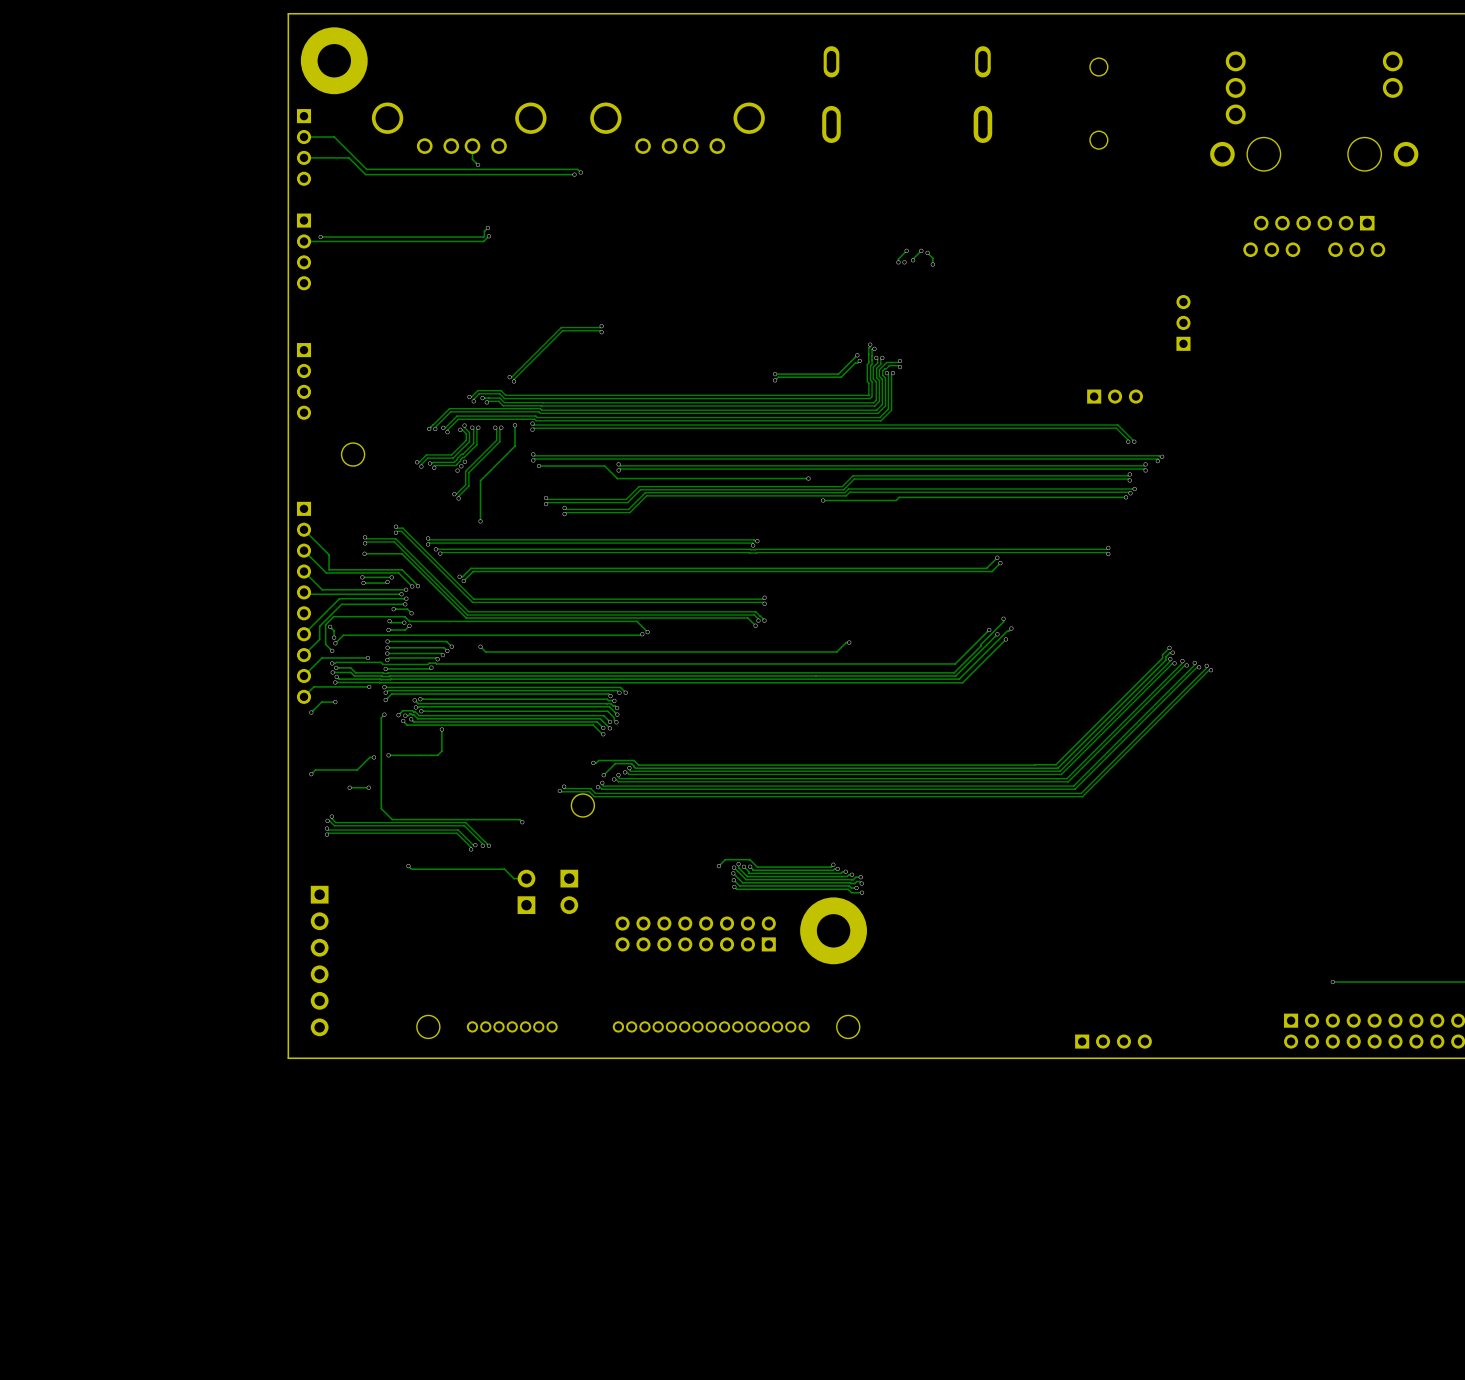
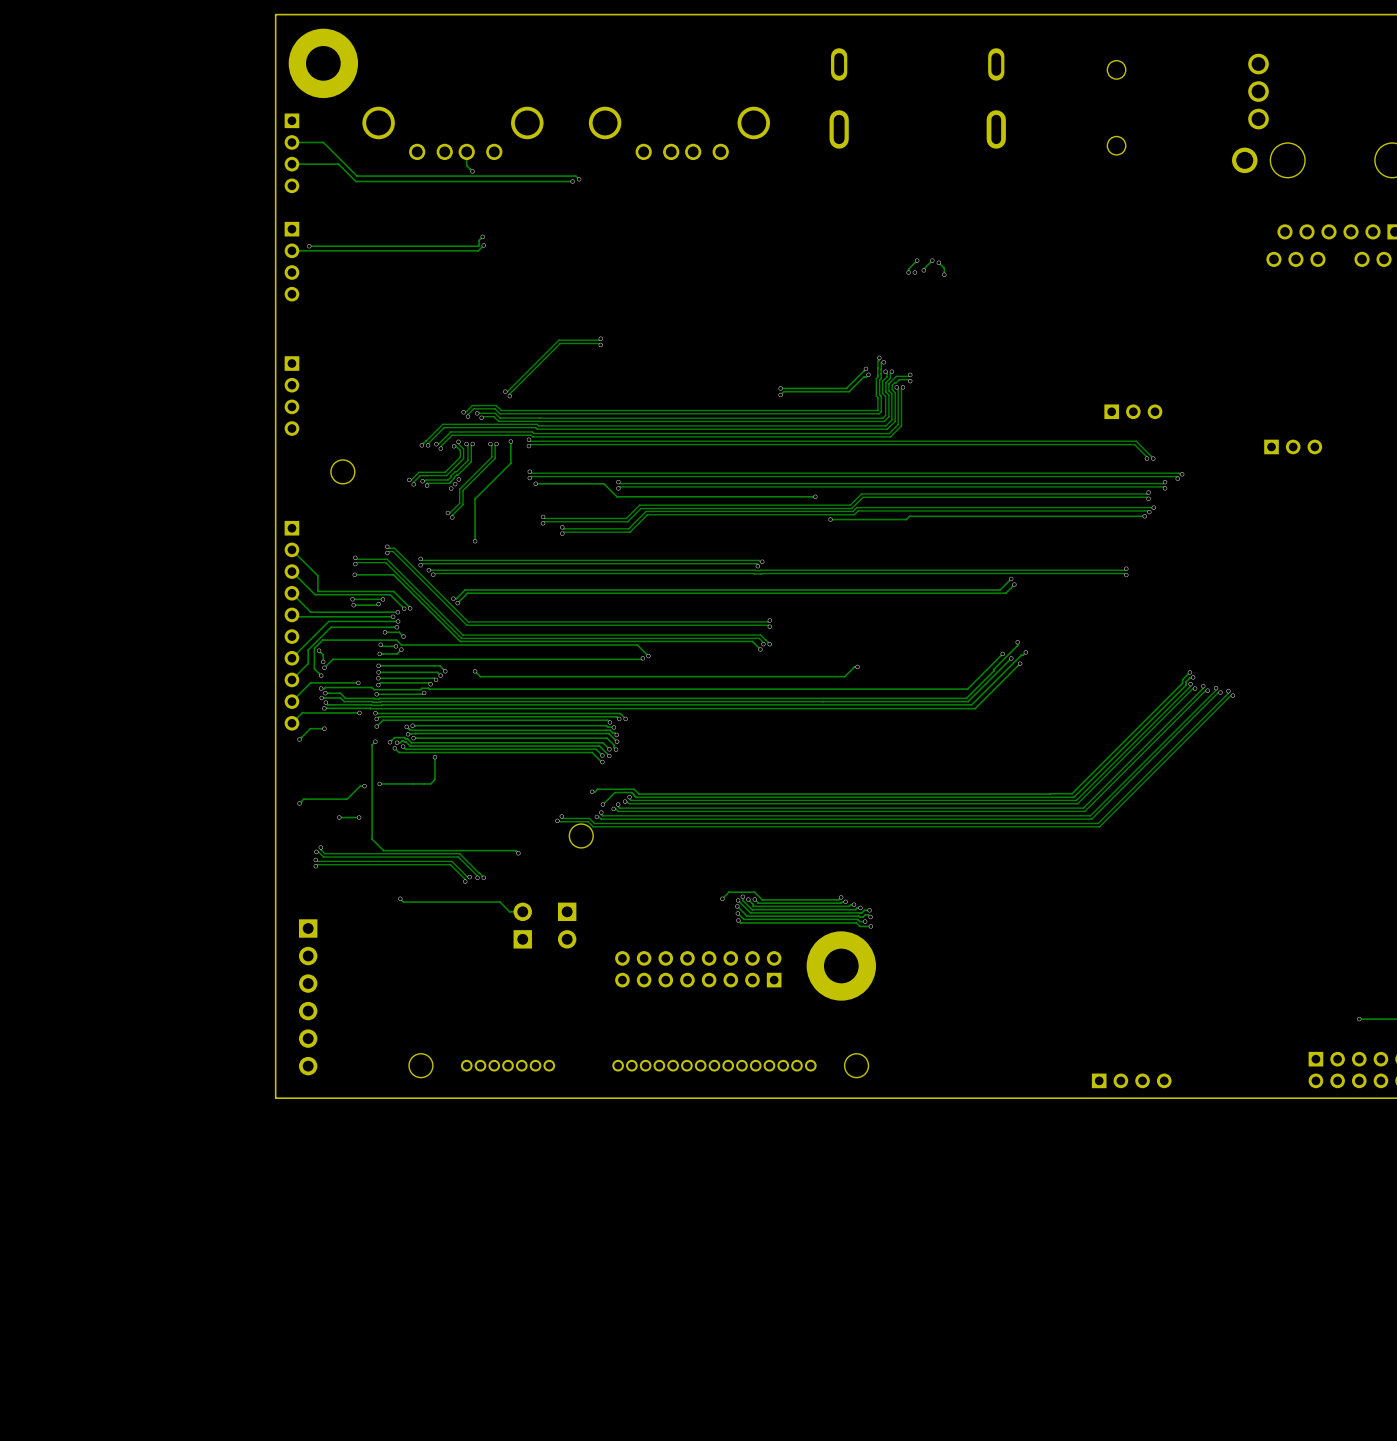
part rotation: 0° (1183, 322) -> 90° clockwise (1293, 446)
part position: (1183, 322) -> (1293, 446)

